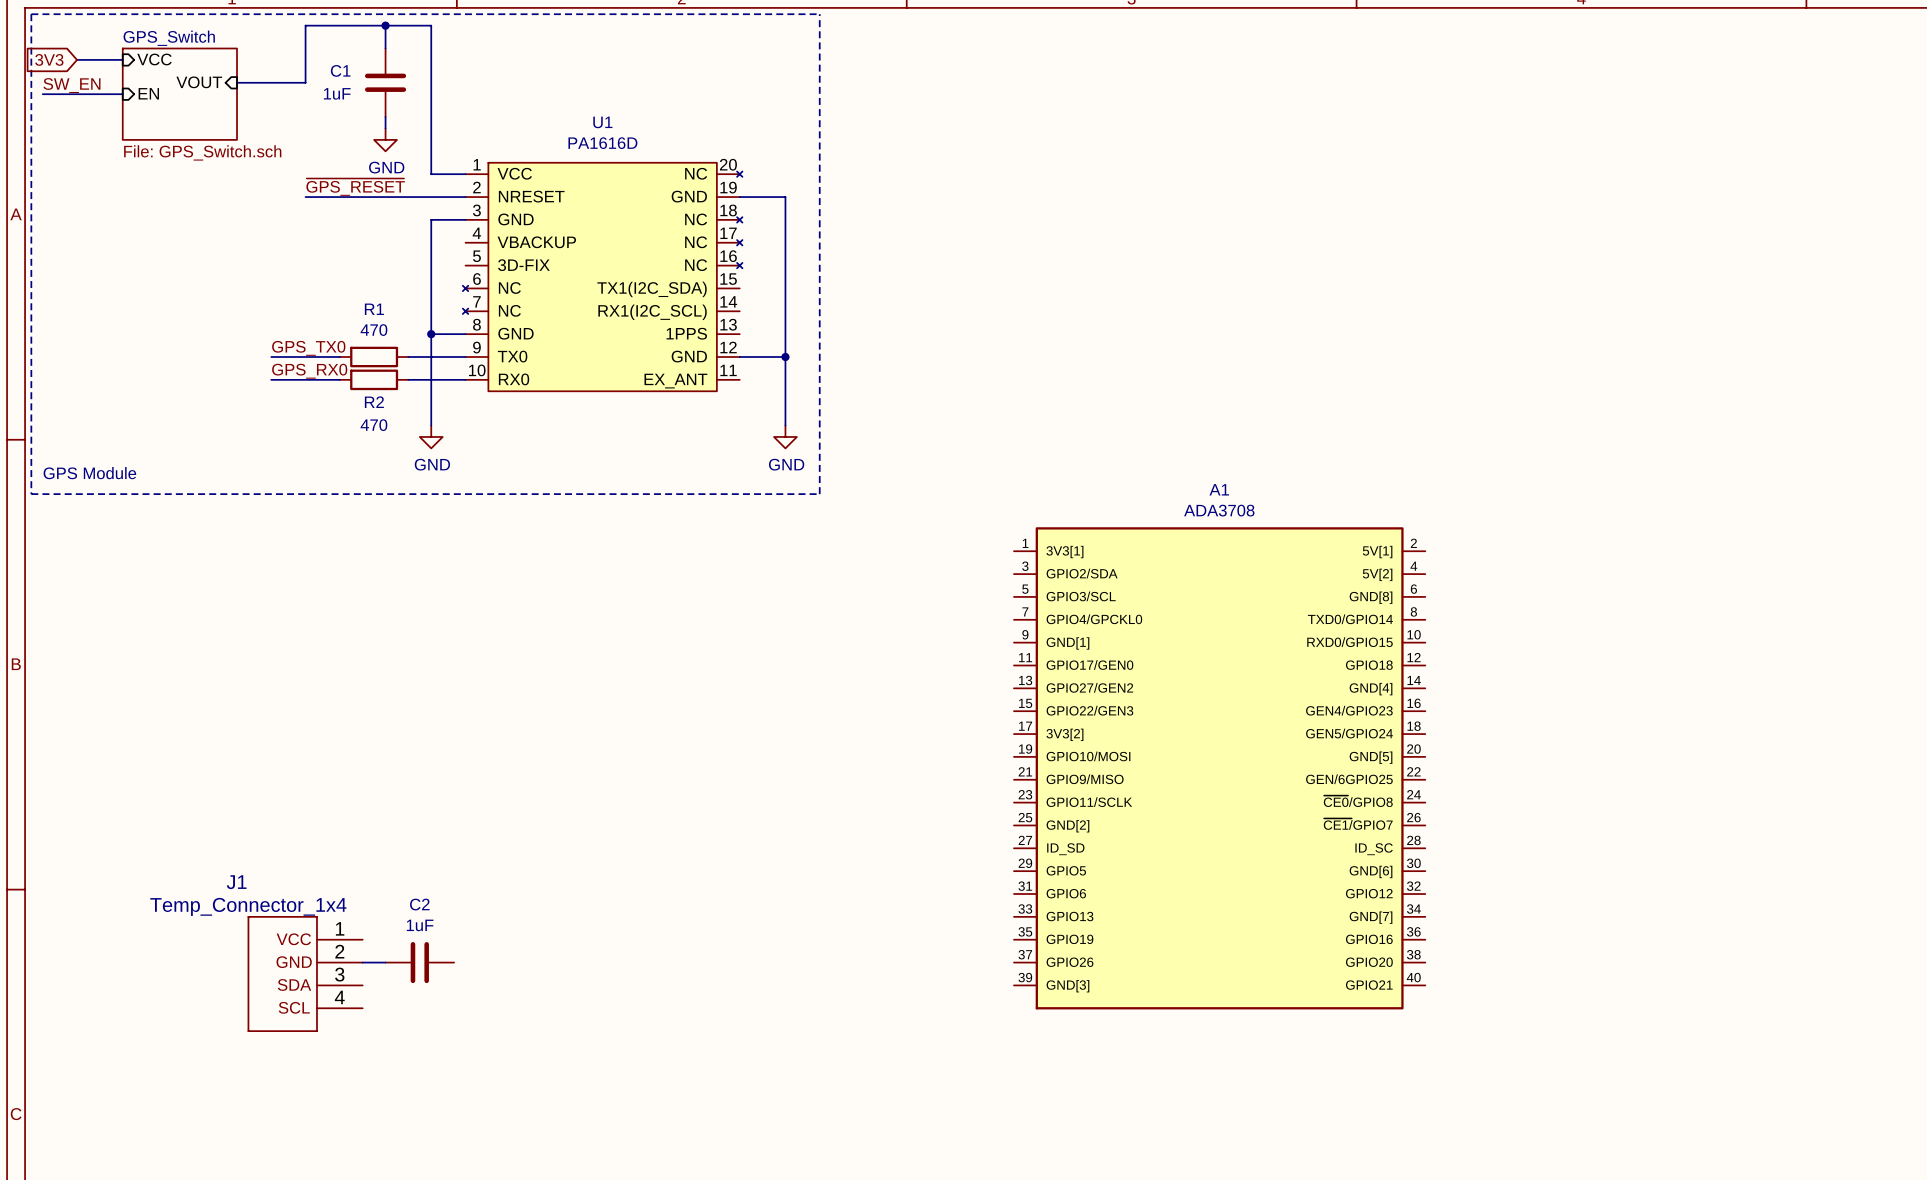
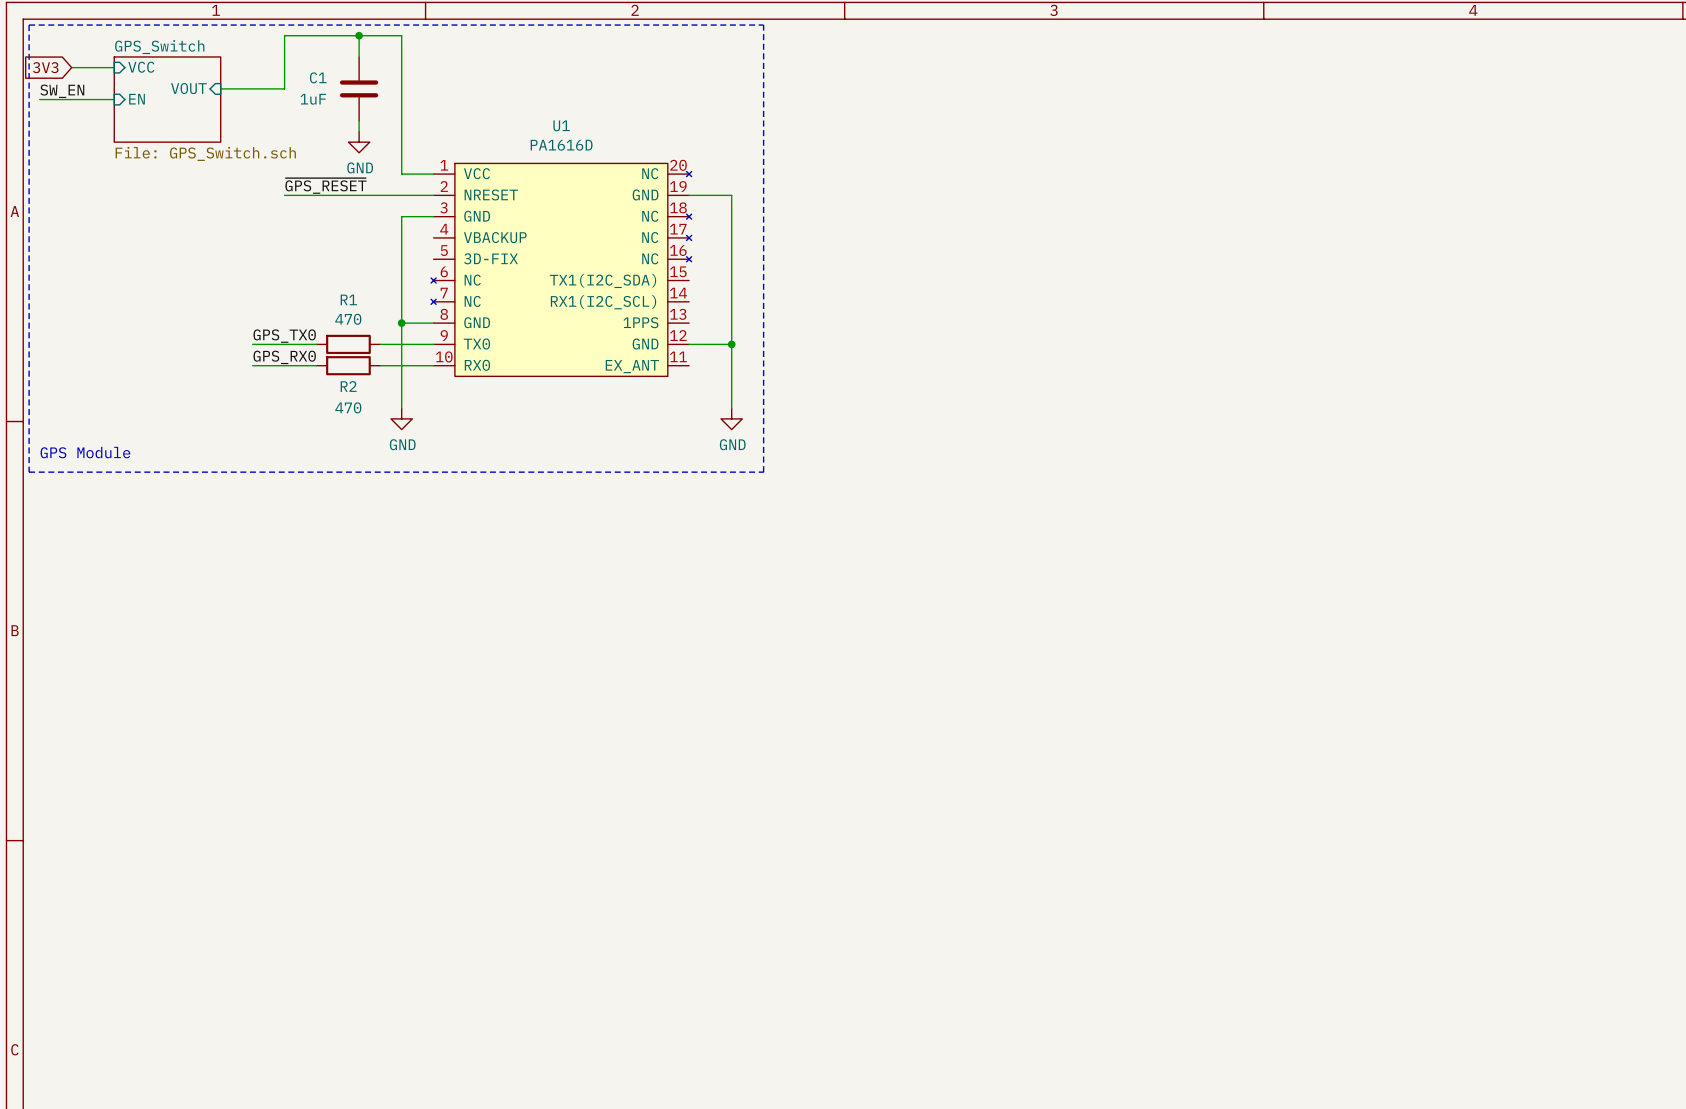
A1: ADA3708 (1219, 768) -> none
wire: (362, 962) (385, 962) -> none
C2: 1uF (419, 962) -> none
J1: Temp_Connector_1x4 (305, 973) -> none

